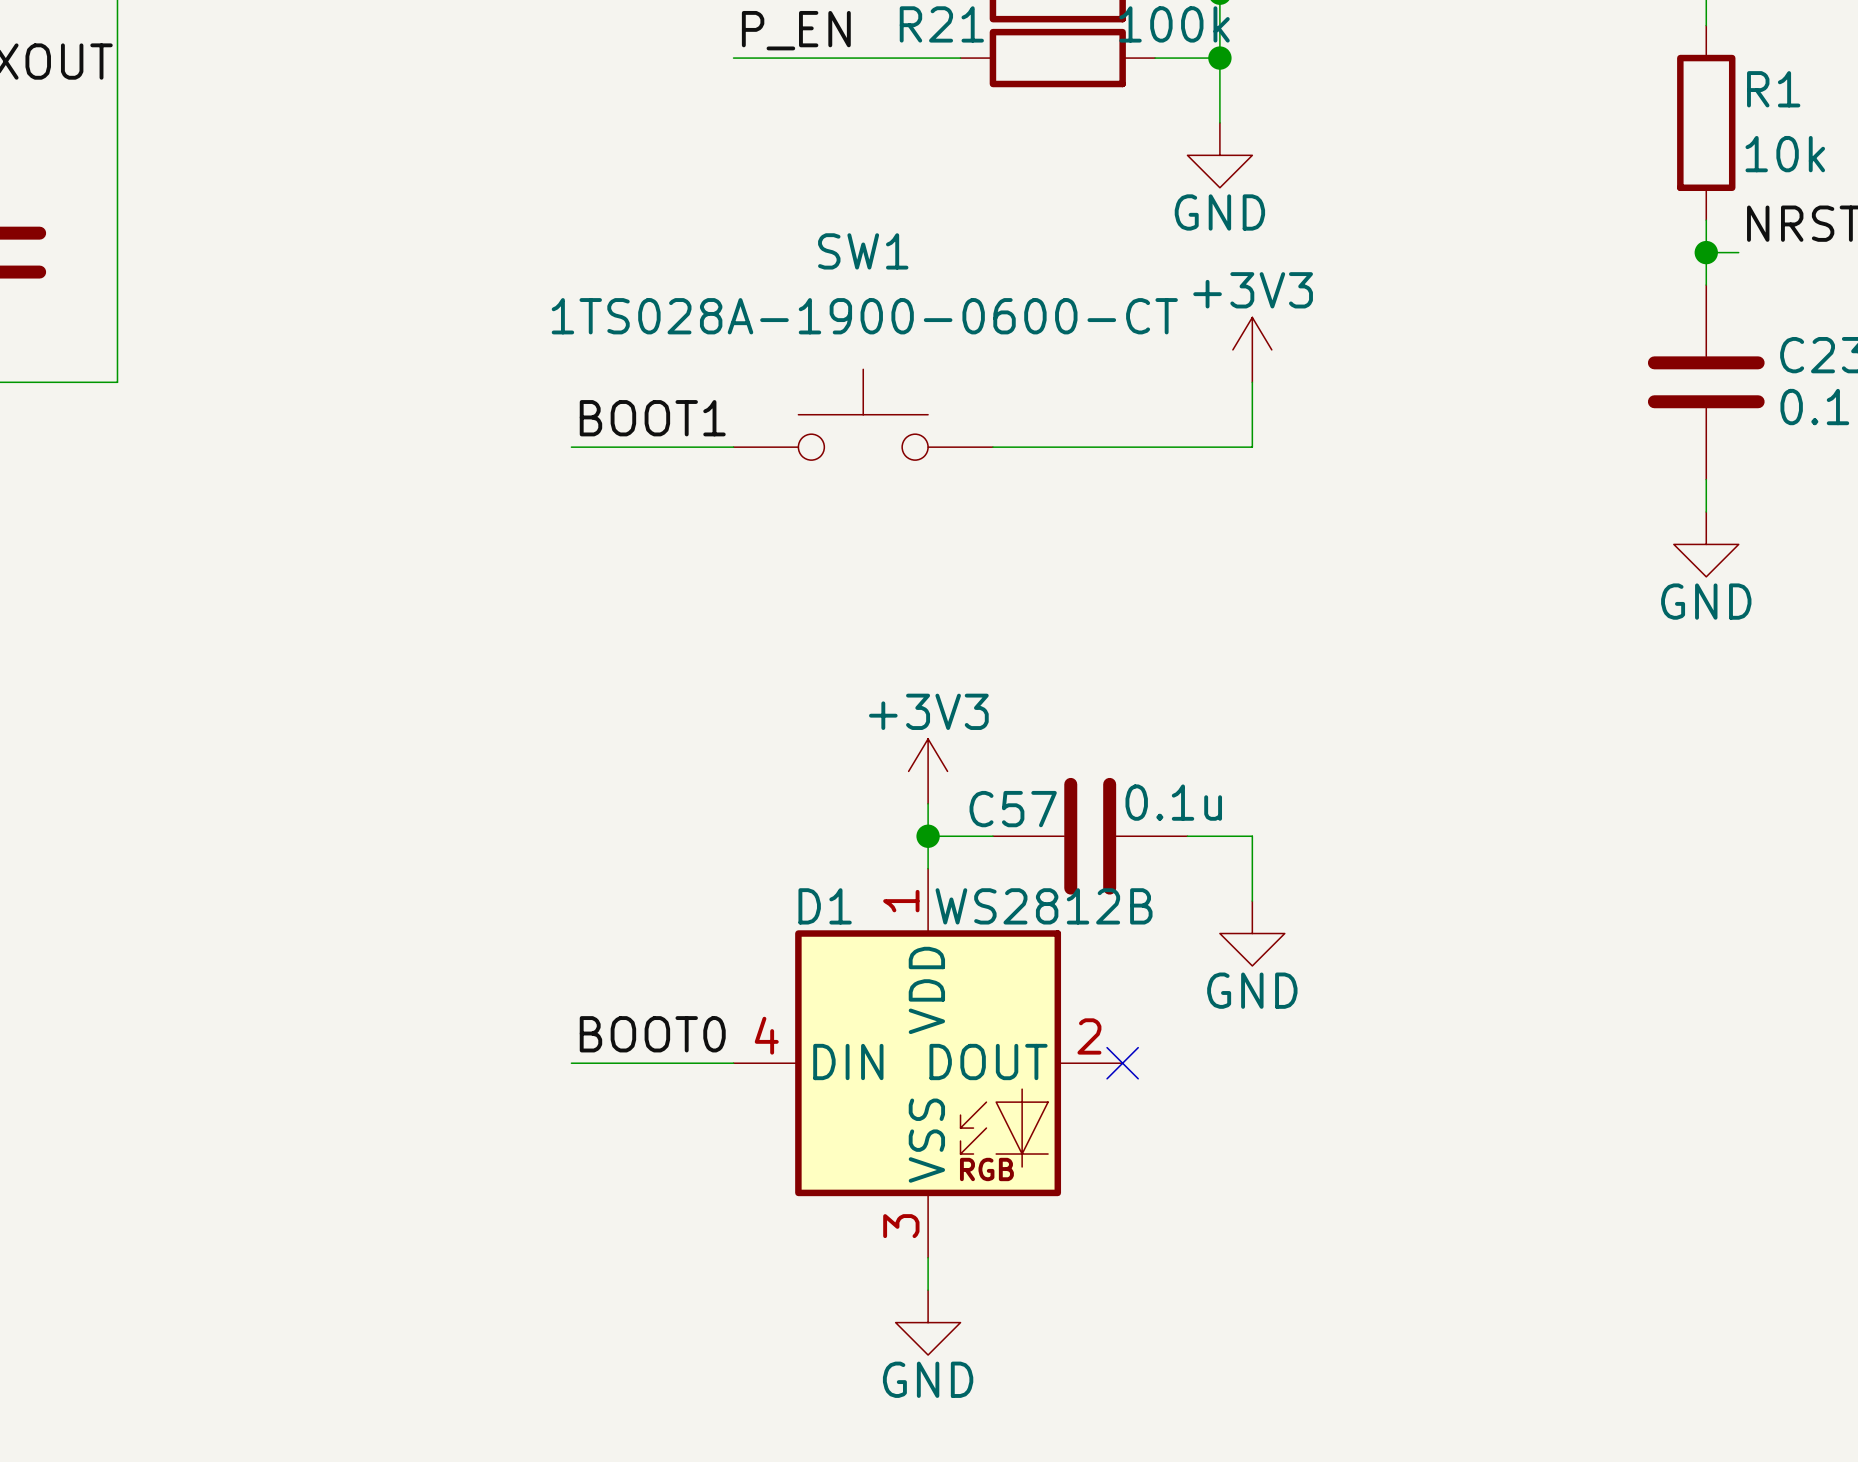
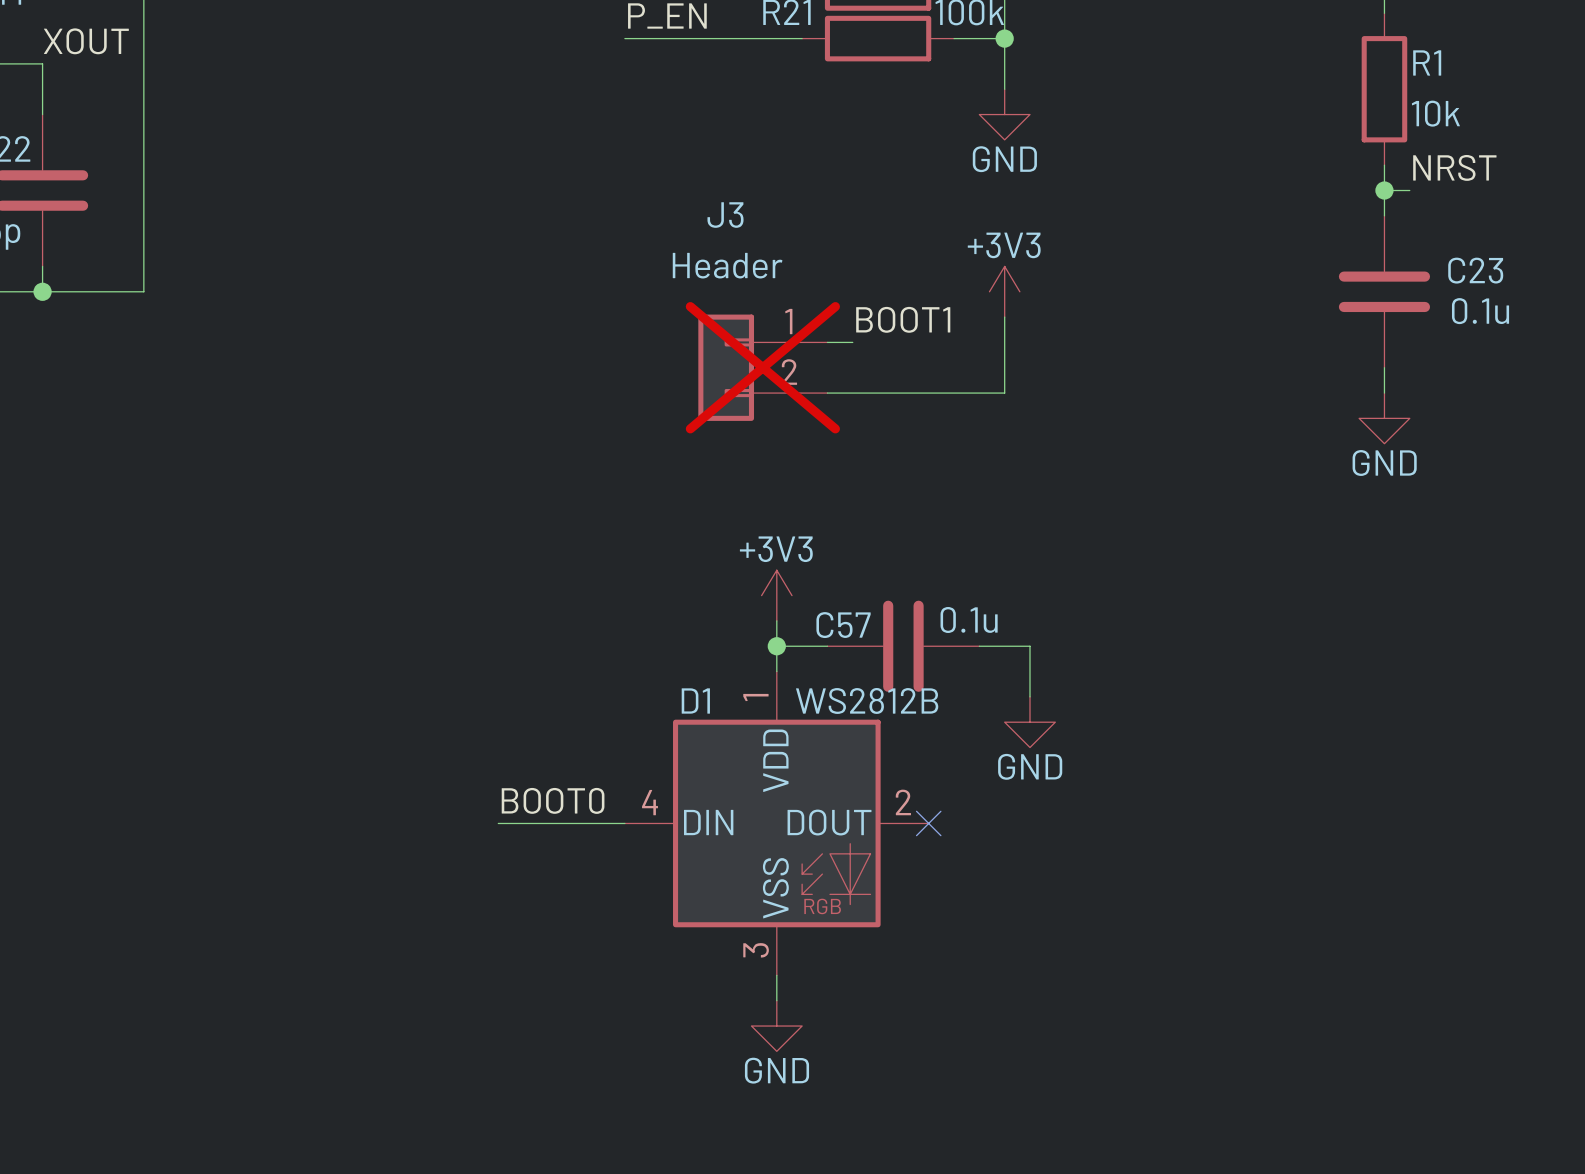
power symbol position: +3V3 (1252, 349) -> +3V3 (1004, 291)
wire: (1252, 382) (1252, 447) (1025, 447) -> none
SW1: 1TS028A-1900-0600-CT (863, 414) -> none
wire: none -> (1004, 317) (1004, 393) (827, 393)
label position: BOOT1 (652, 418) -> BOOT1 (903, 319)
wire: (571, 447) (733, 447) -> none
J3: none -> Header (762, 367)

